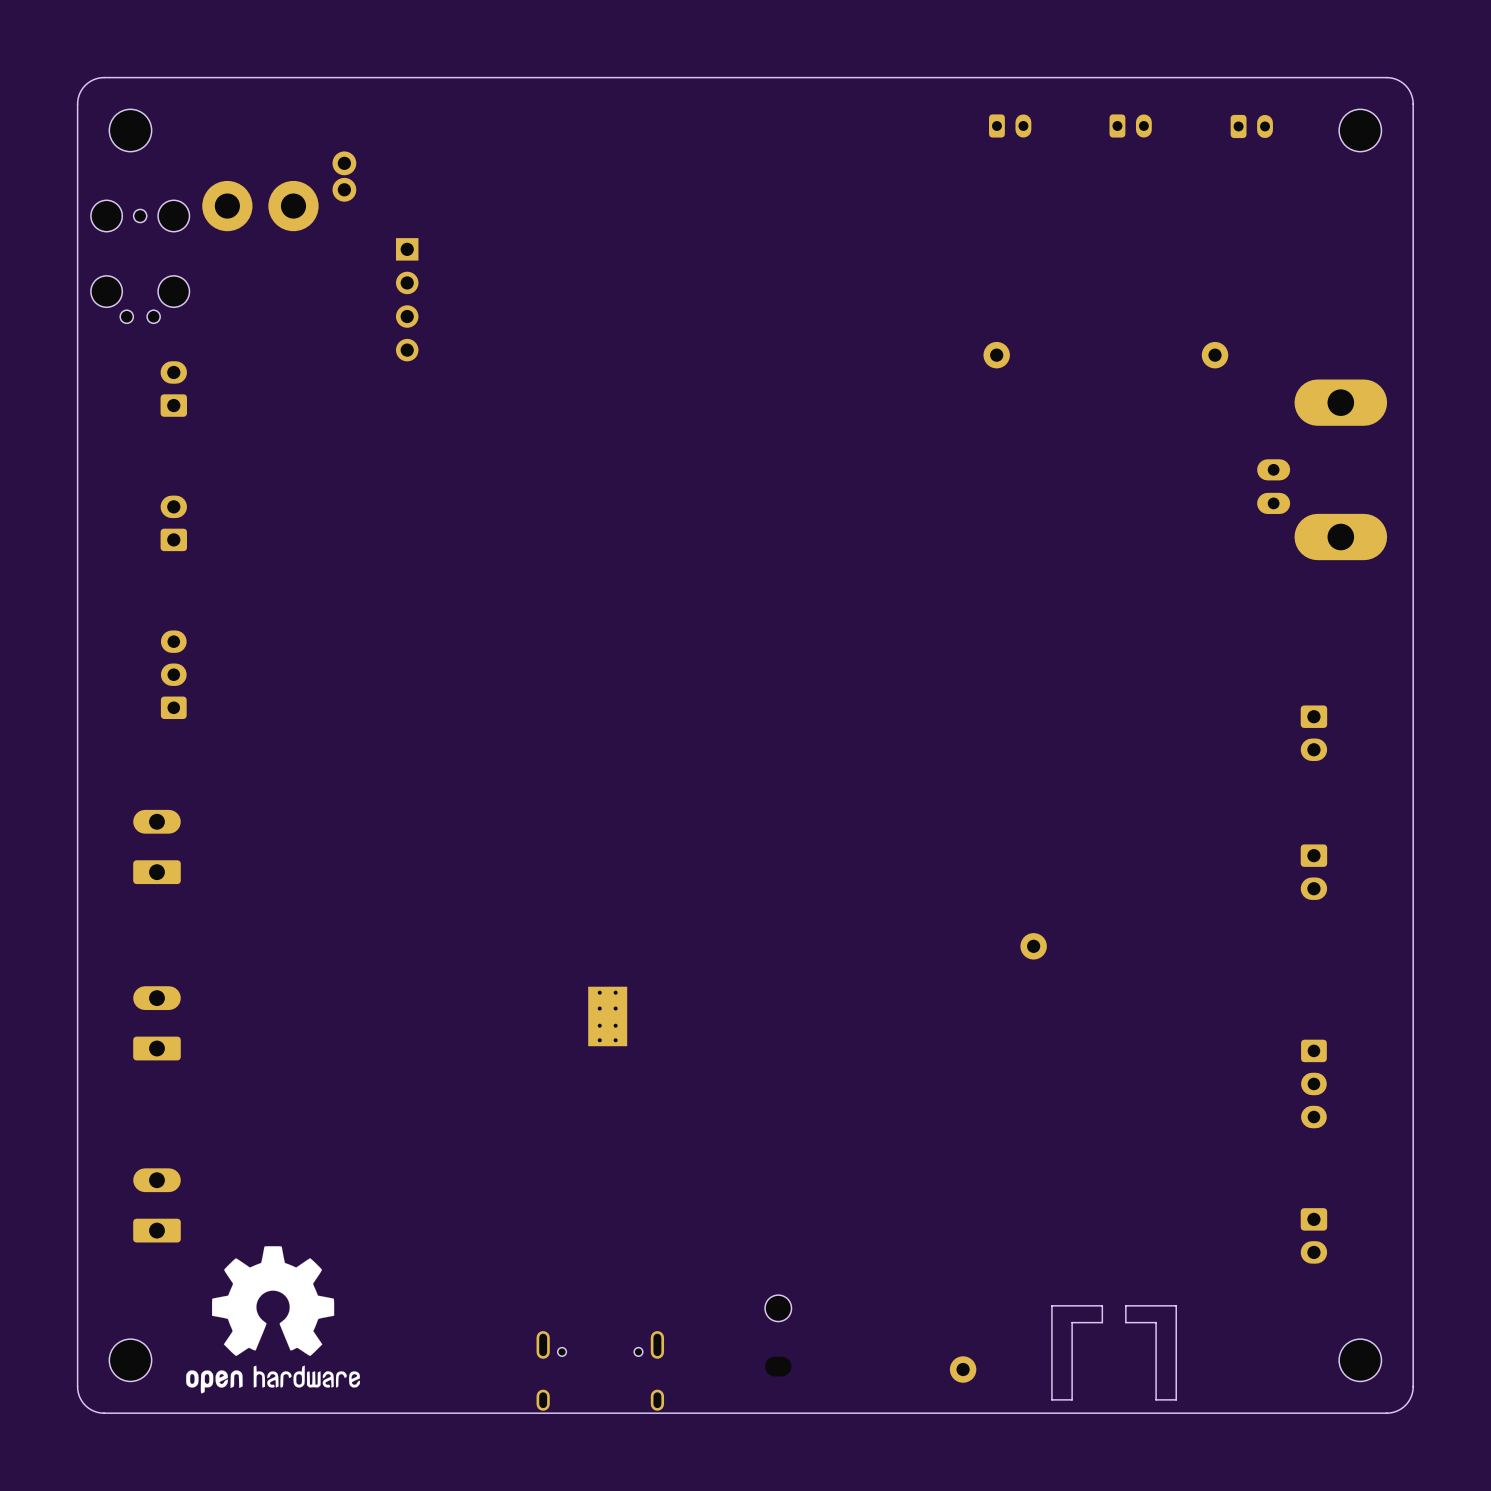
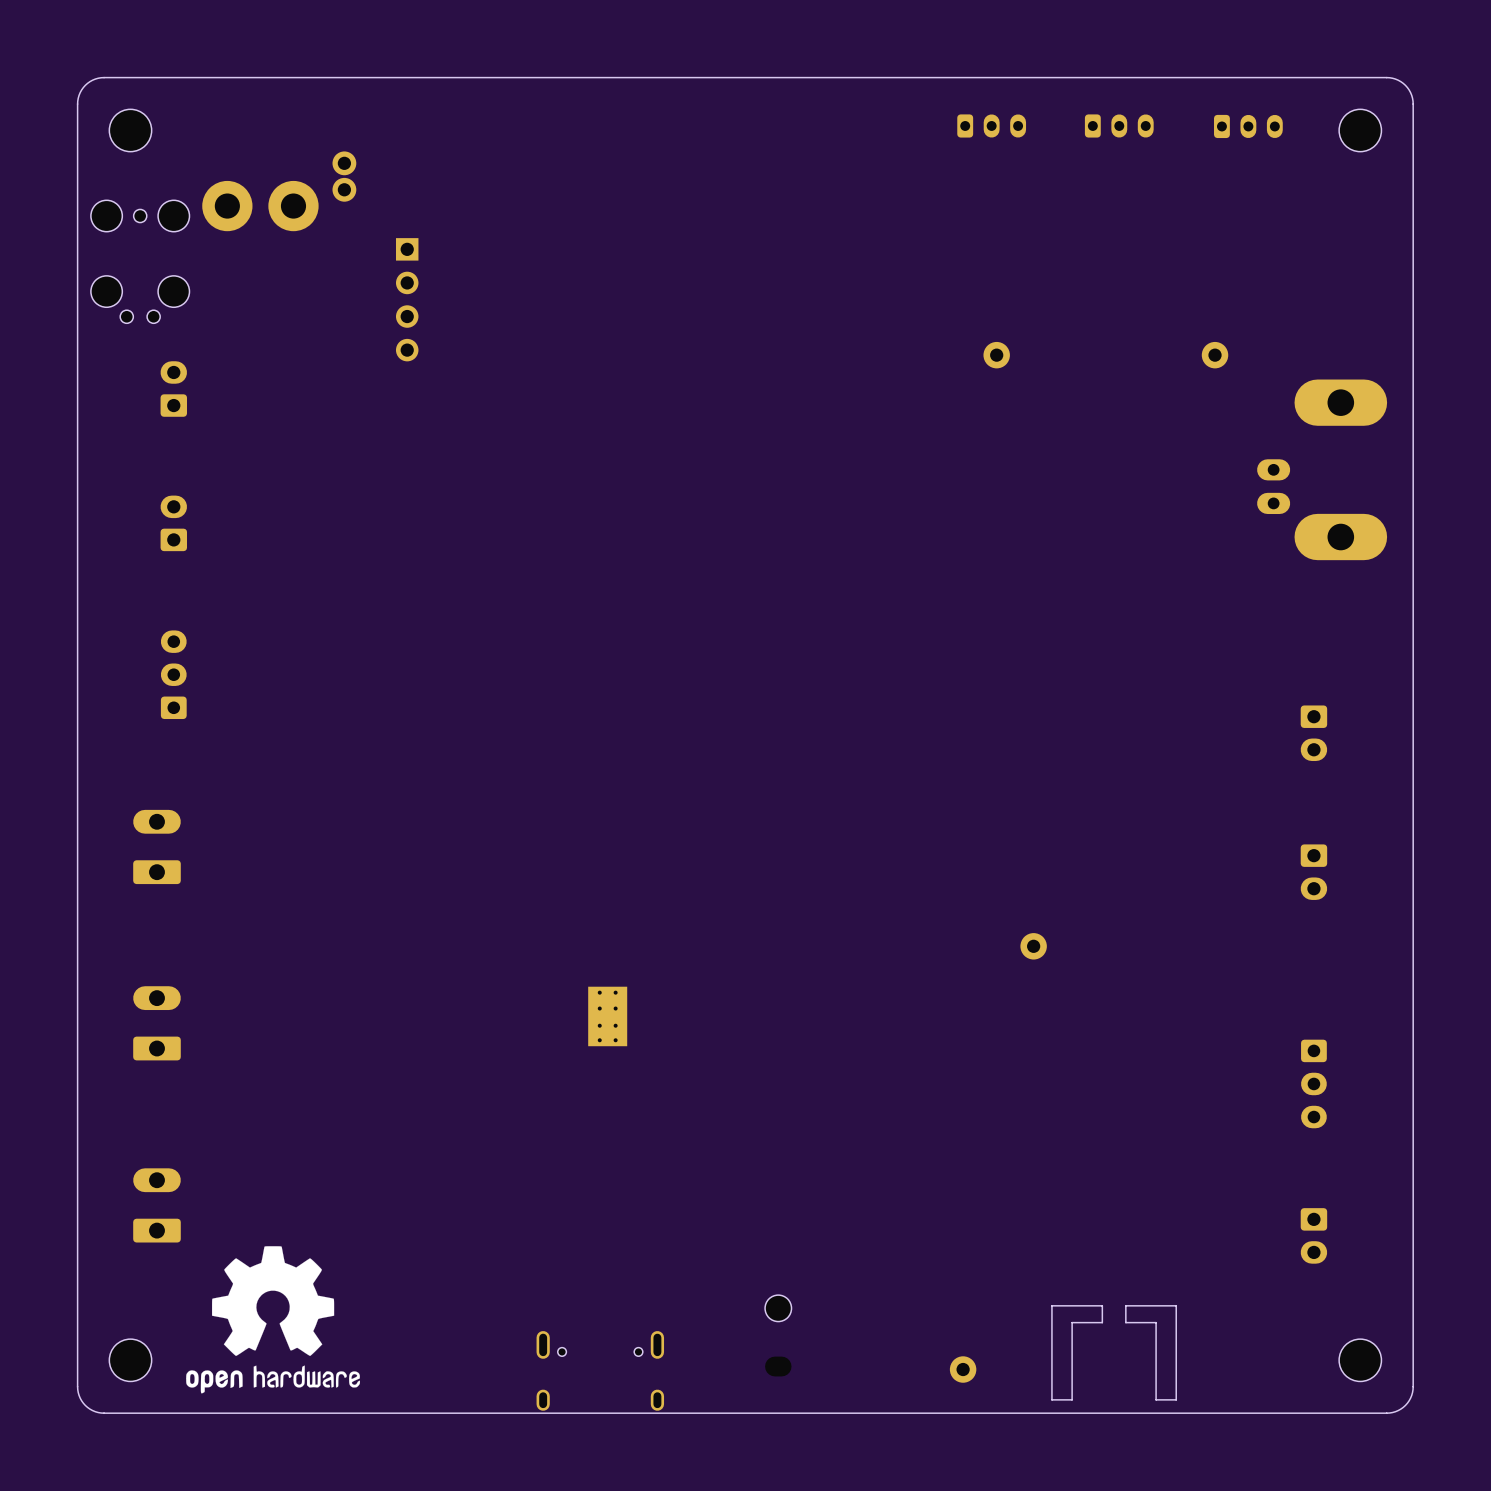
part footprint: [1109, 114, 1152, 138] -> [1084, 114, 1154, 138]
part footprint: [1230, 114, 1273, 139] -> [1214, 114, 1283, 139]
part: none -> (991, 125)
part: (1010, 125) -> none

